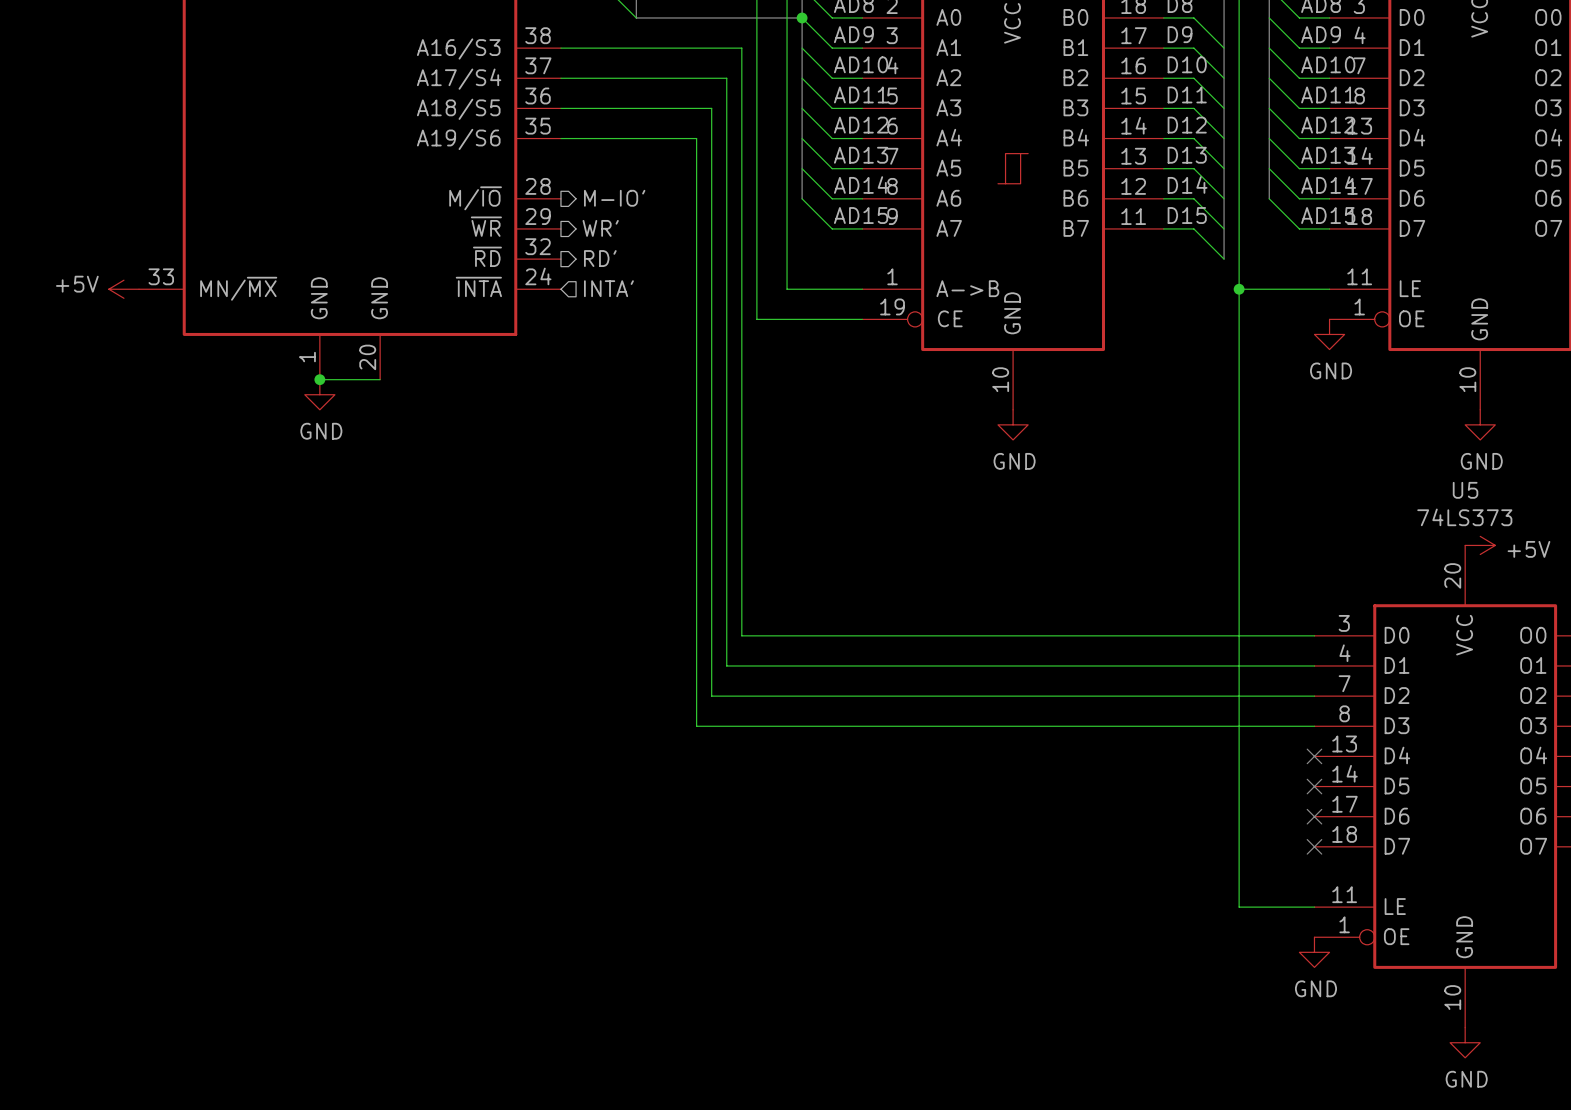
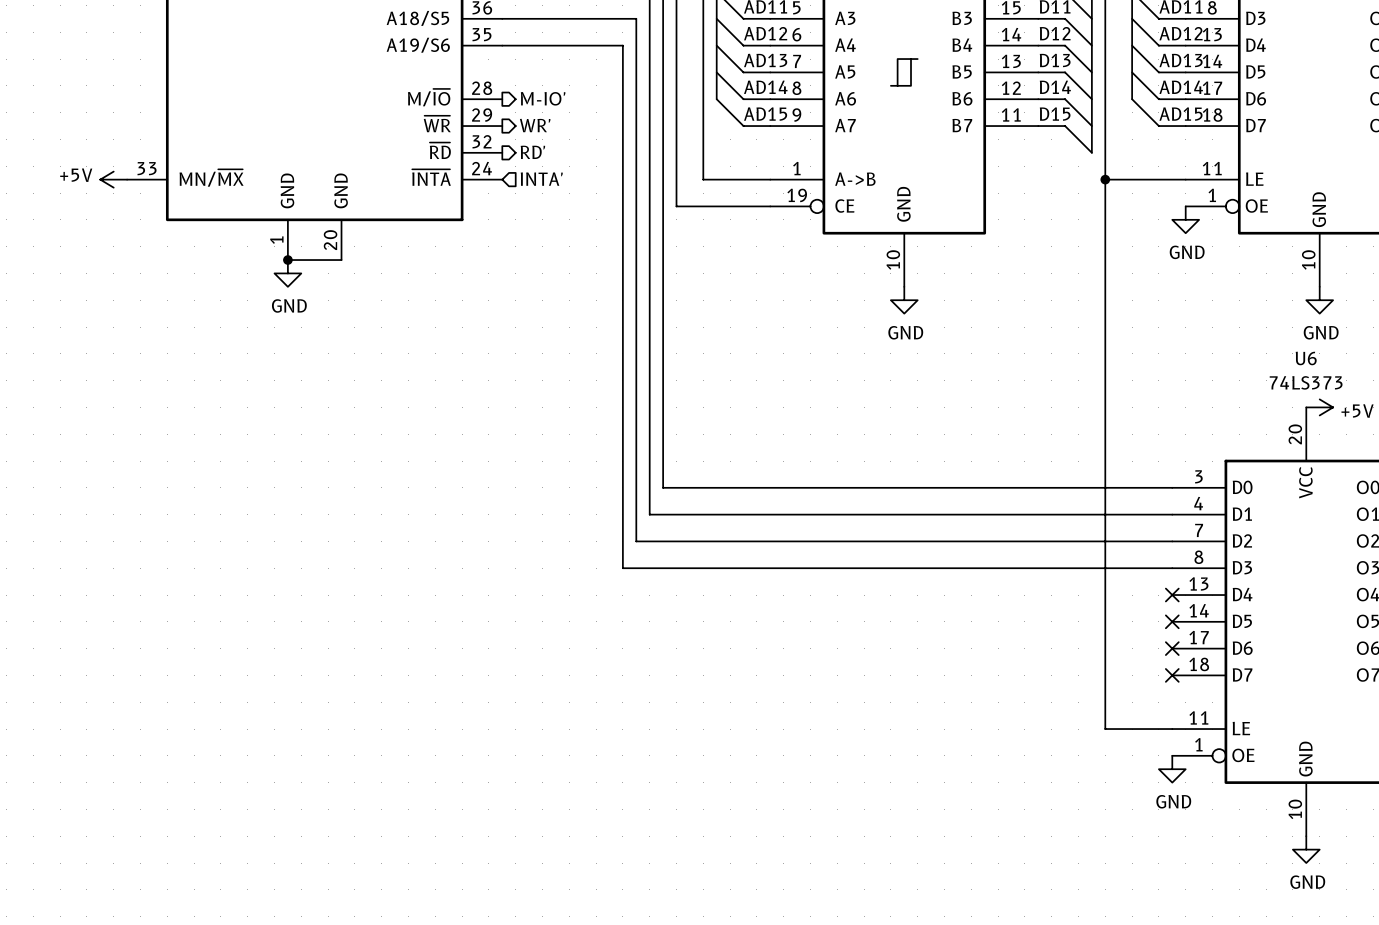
U5 name: U5 (1465, 490) -> U6 (1306, 358)

